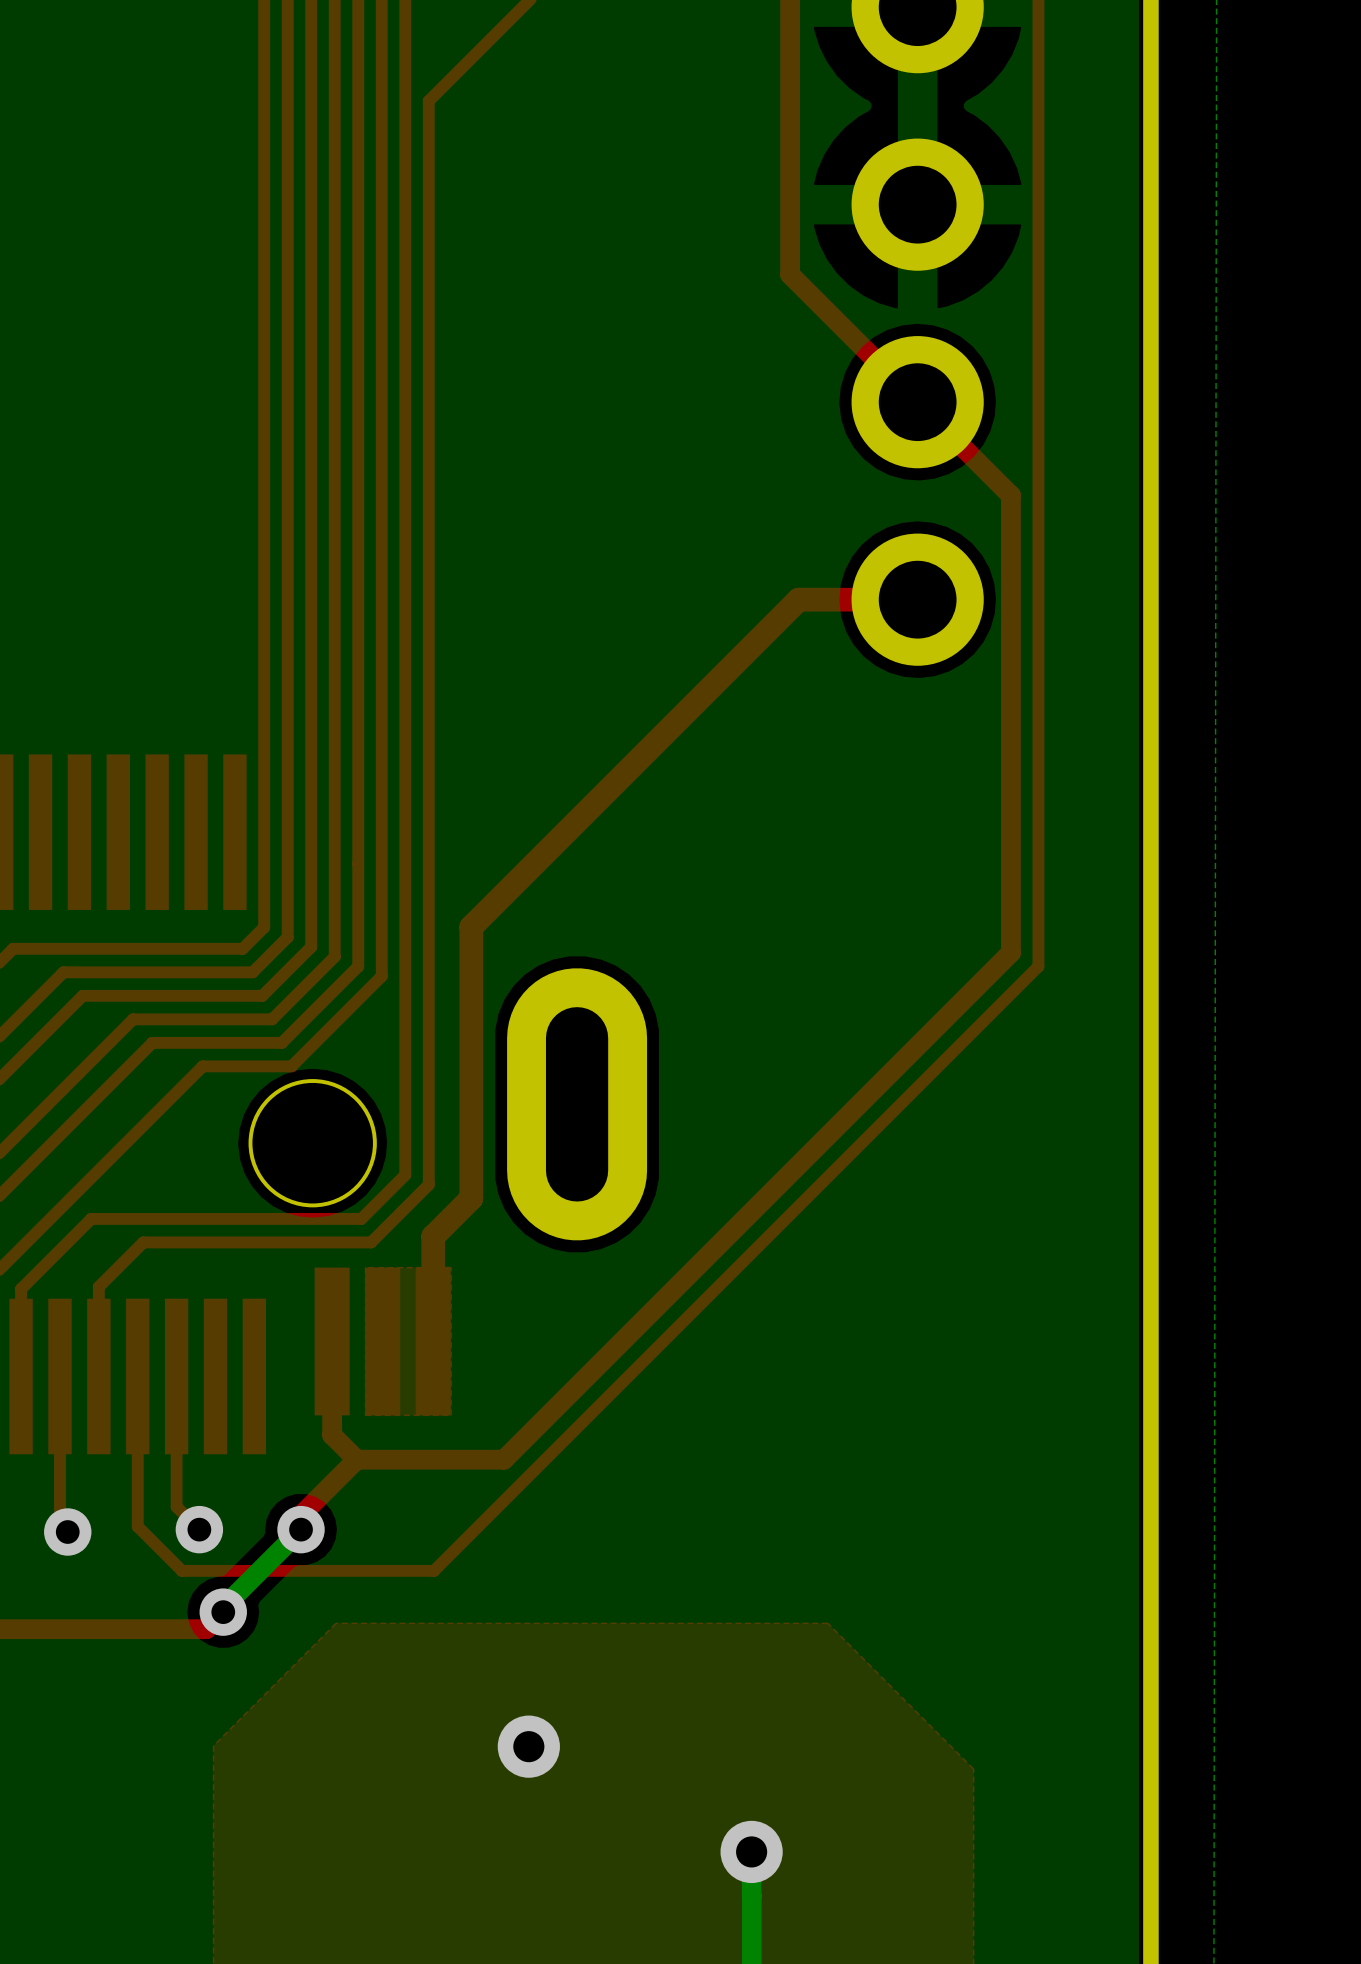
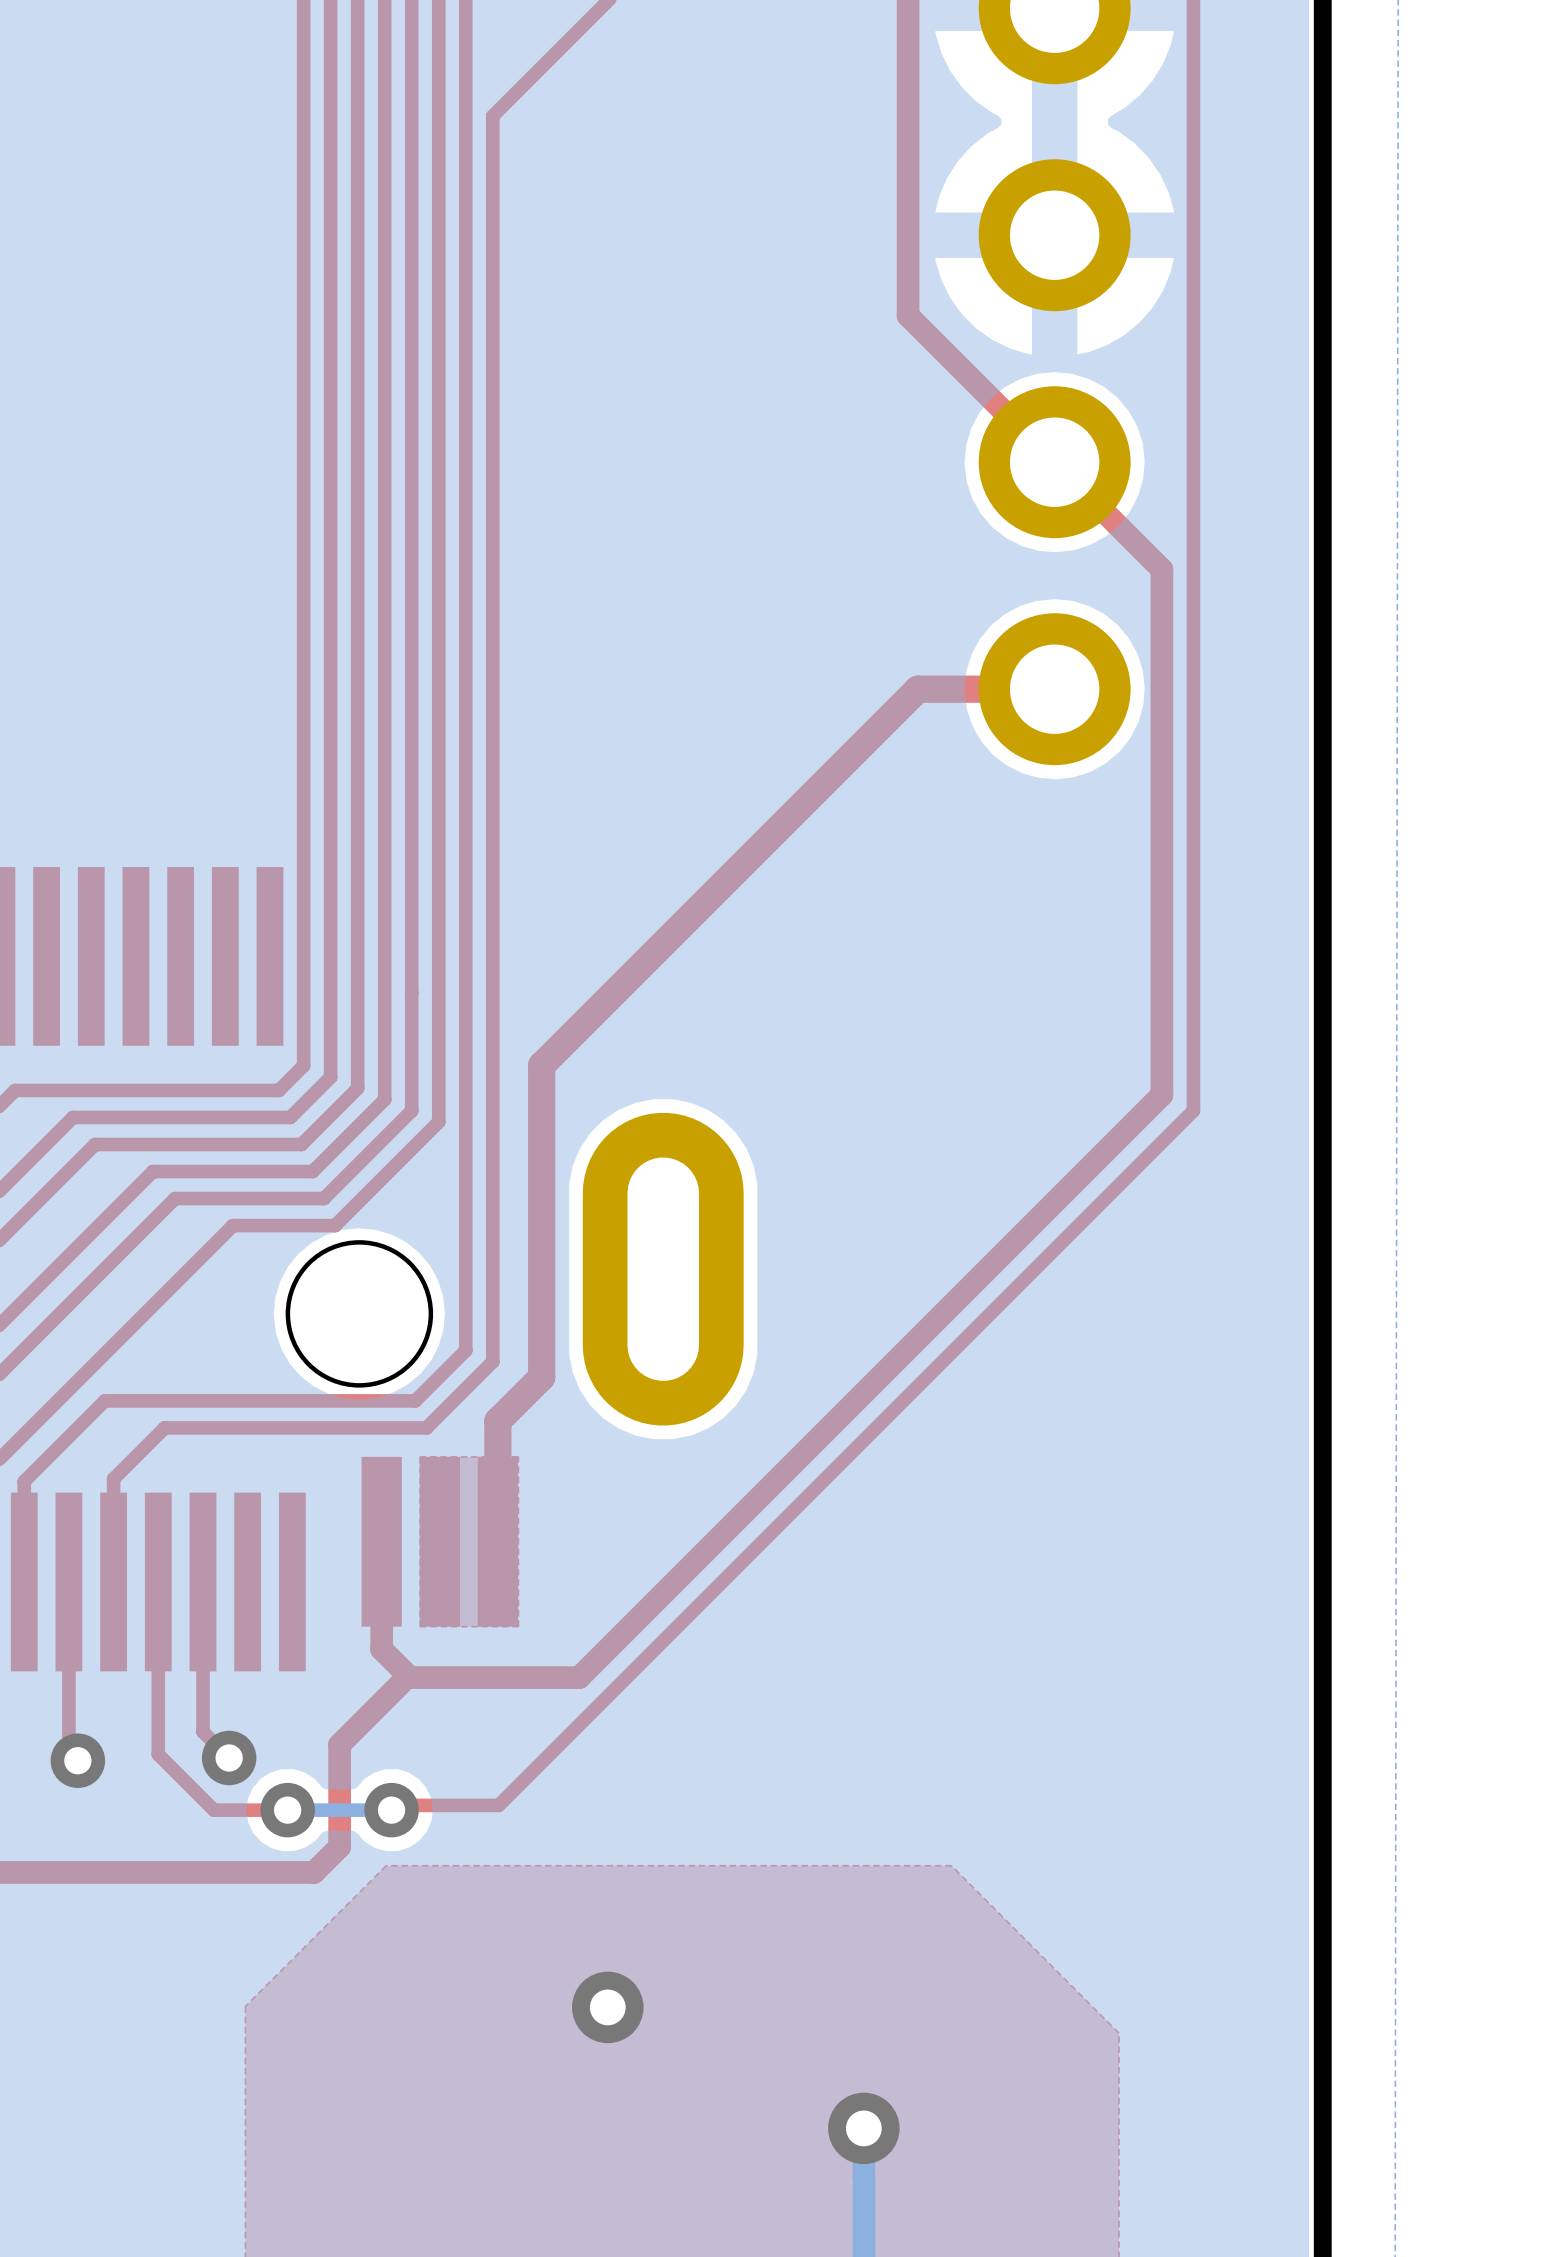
top track: (356, 1459) (301, 1515) (301, 1529) -> (409, 1677) (406, 1677) (339, 1744) (339, 1846) (314, 1872) (236, 1872)
bottom track: (301, 1529) (223, 1607) (223, 1612) -> none
via position: (301, 1529) -> (391, 1810)
top track: (344, 1570) (182, 1570) -> (287, 1810) (213, 1810) (209, 1805)
bottom track: none -> (391, 1810) (287, 1810)
via position: (223, 1612) -> (287, 1810)

